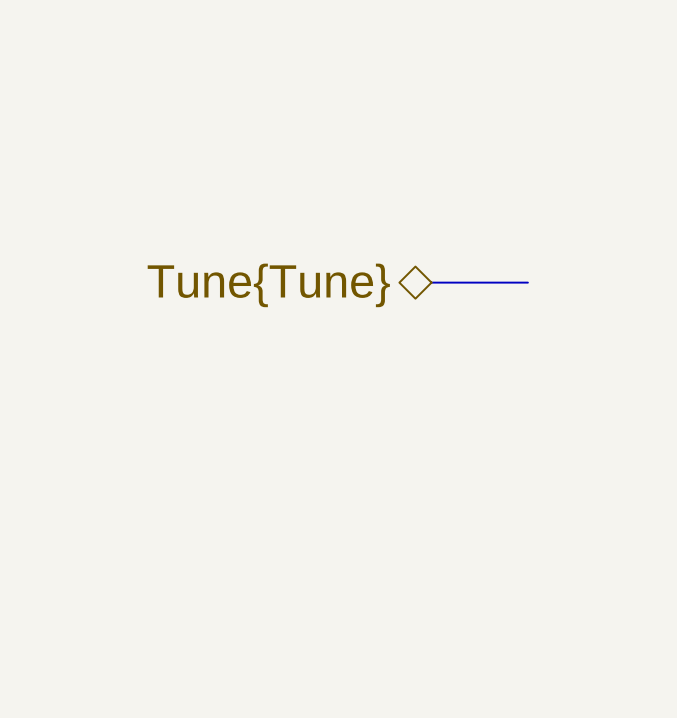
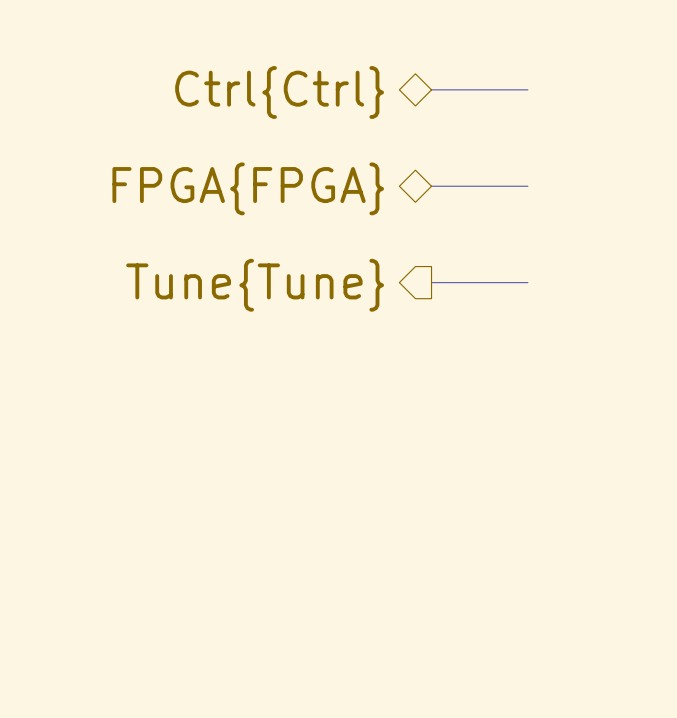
bus: none -> (431, 89) (527, 89)
hierarchical label: none -> Ctrl{Ctrl} (279, 92)
bus: none -> (431, 186) (527, 186)
hierarchical label: none -> FPGA{FPGA} (248, 188)
hierarchical label shape: bidirectional (268, 285) -> output (255, 285)

